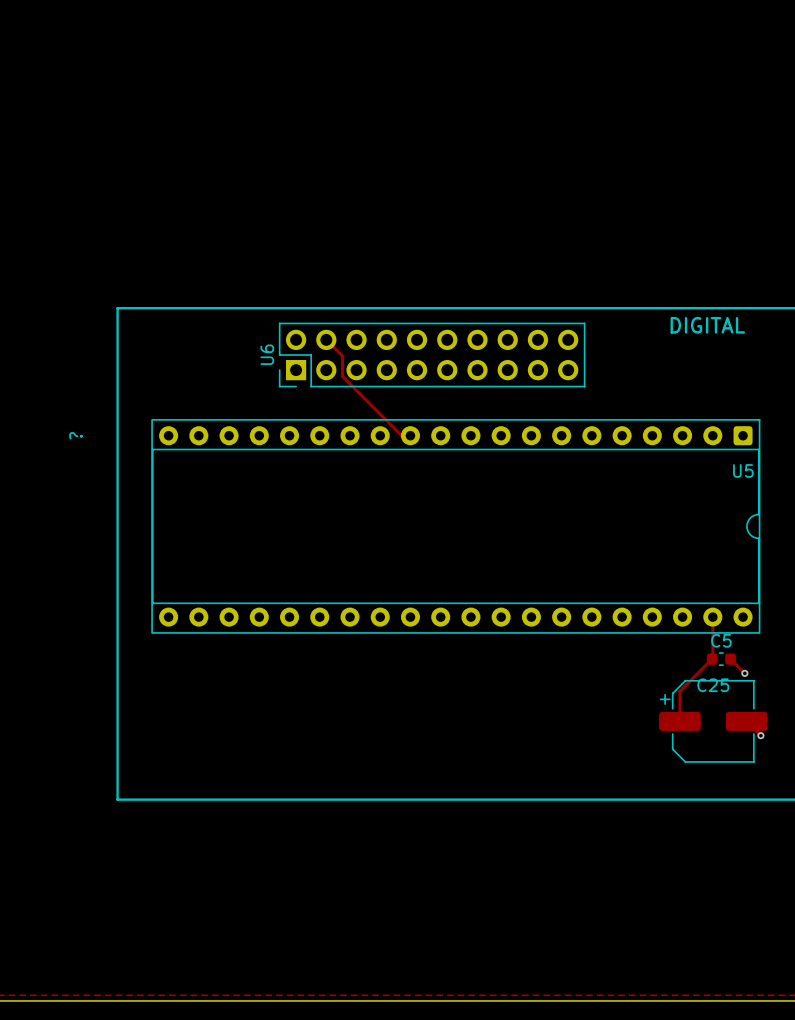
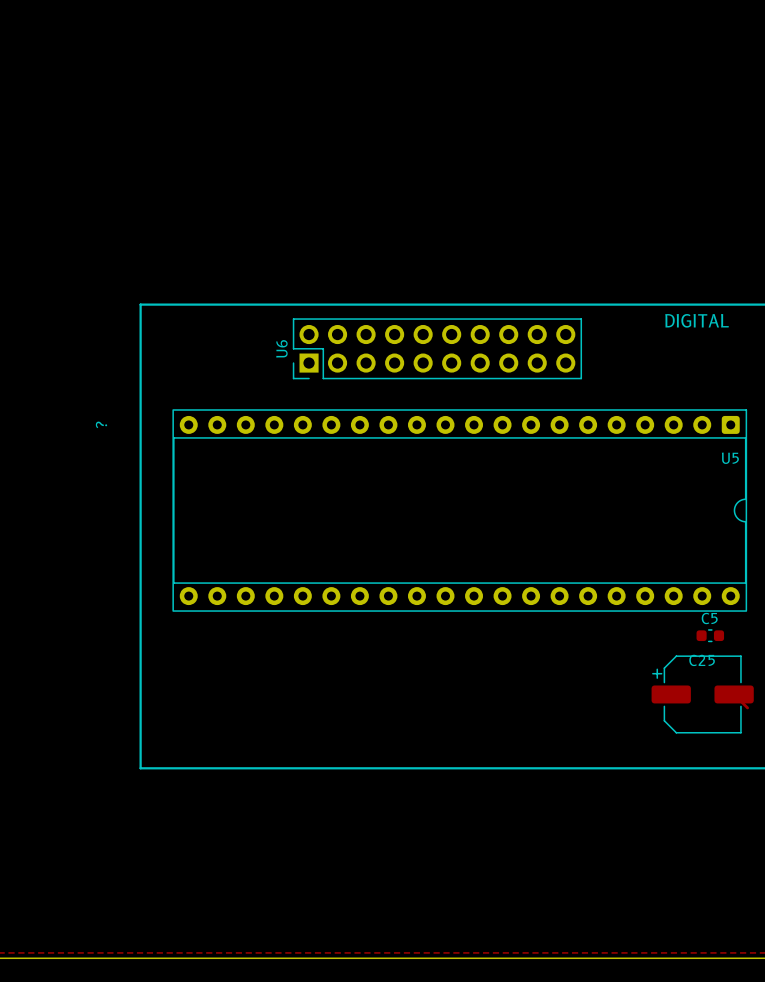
track: (326, 339) (342, 356) (342, 376) (401, 435) (410, 435) -> none
track: (712, 617) (712, 658) (679, 691) (679, 721) -> none
track: (730, 659) (744, 673) -> none
via: (744, 673) -> none
via: (760, 735) -> none

